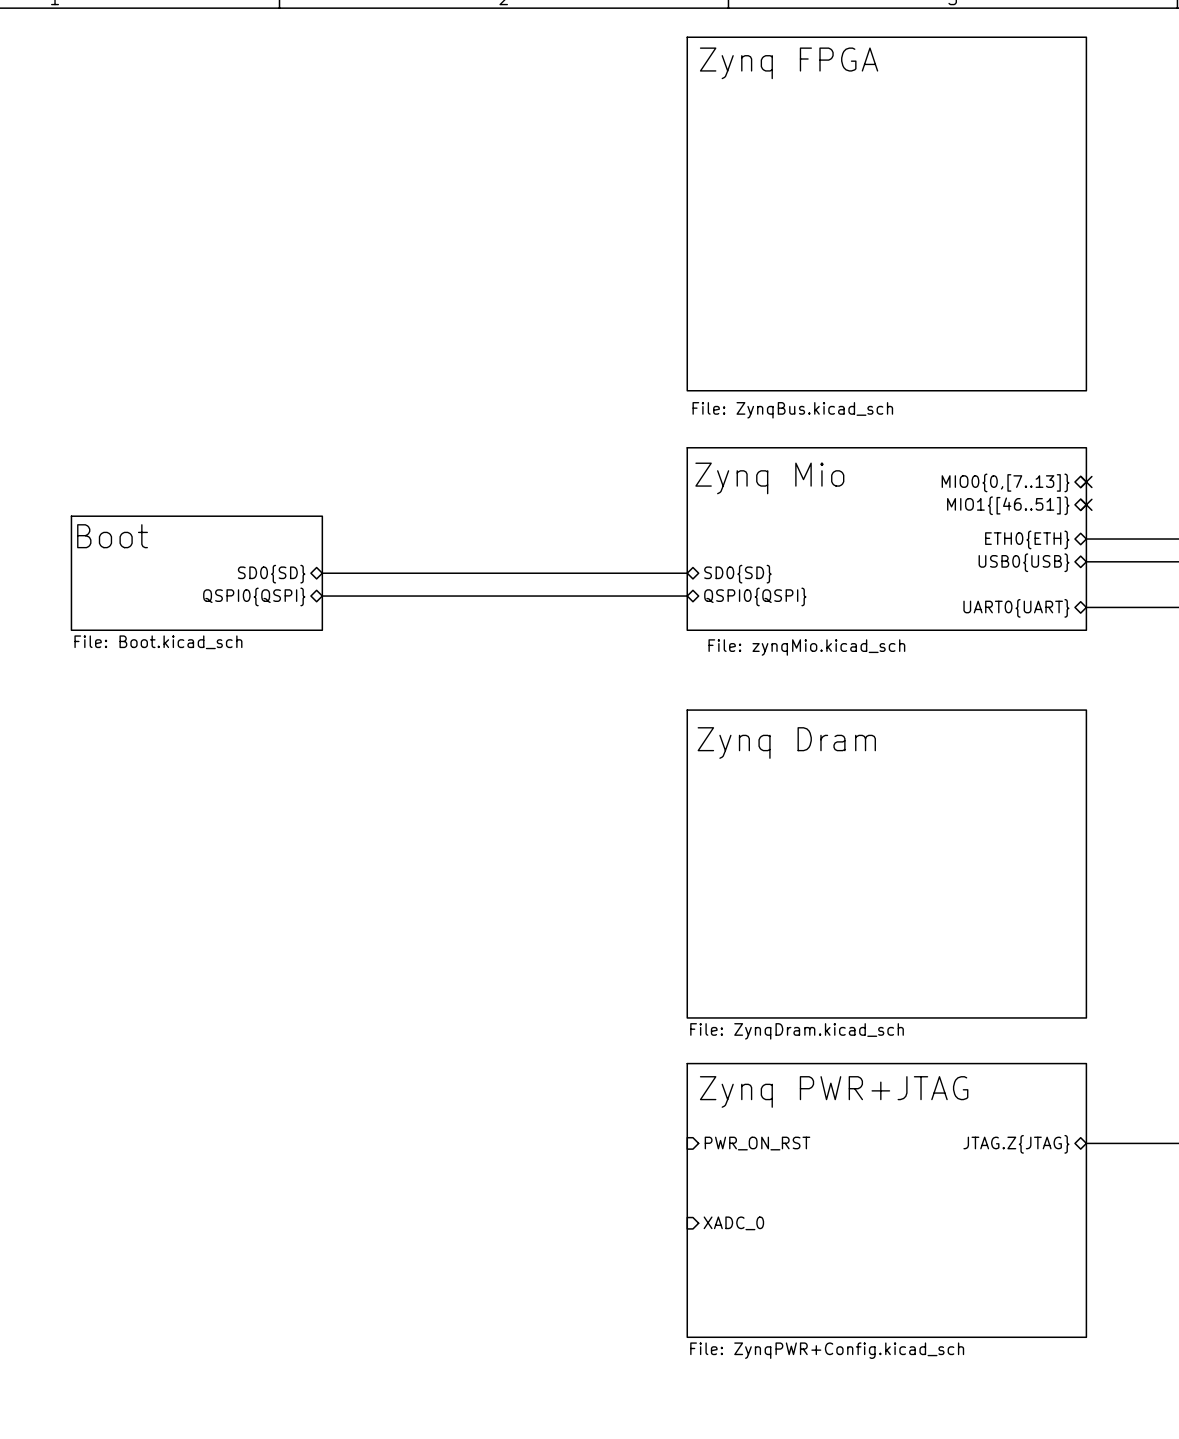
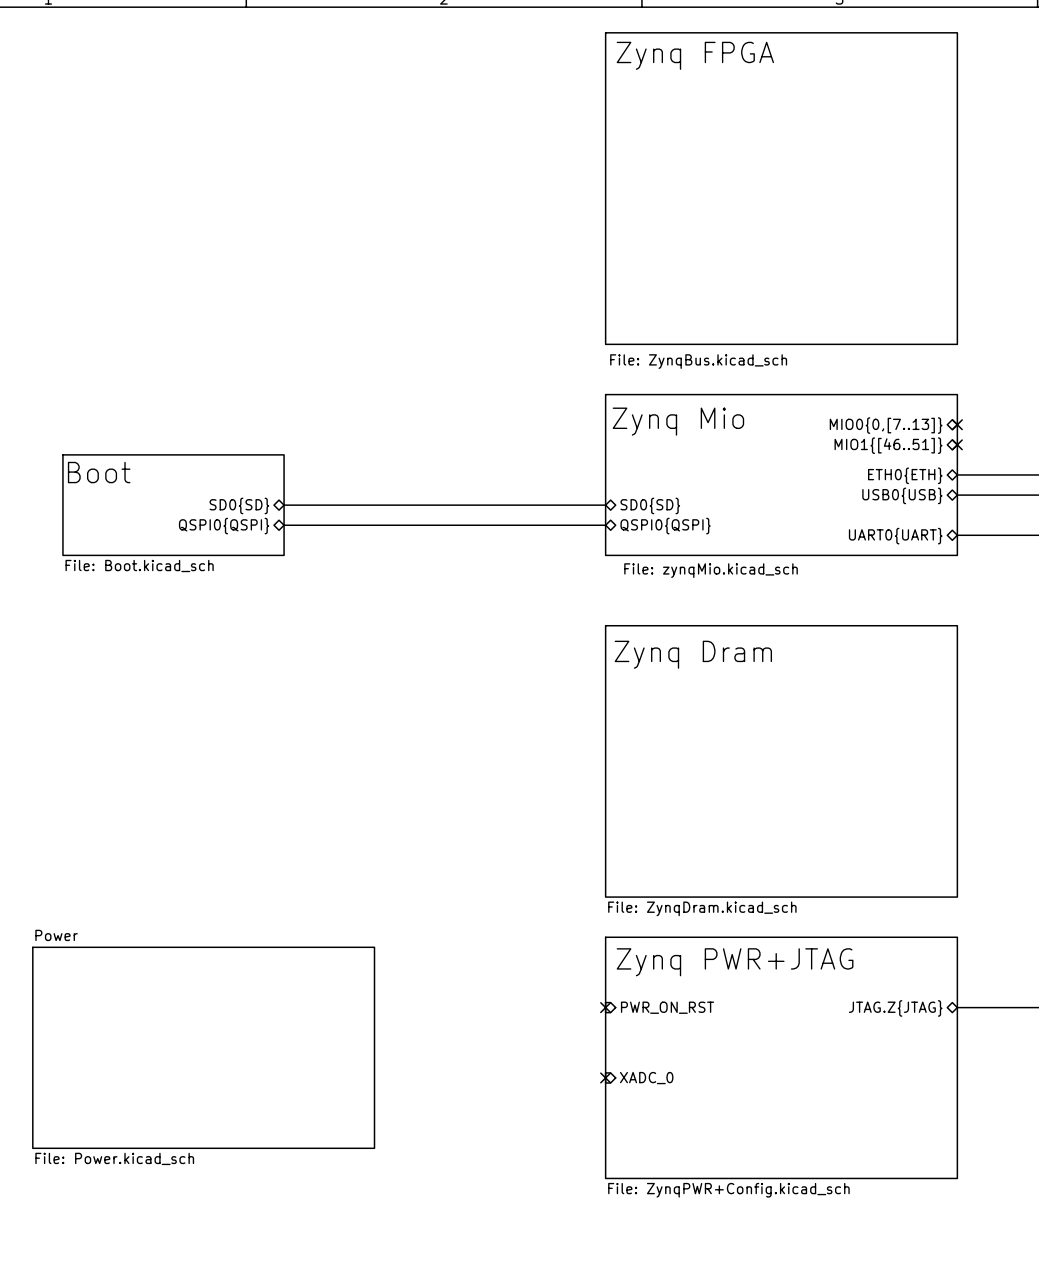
no-connect mark: none -> (605, 1007)
sheet Power: none -> File: Power.kicad_sch (203, 1047)
no-connect mark: none -> (605, 1077)

